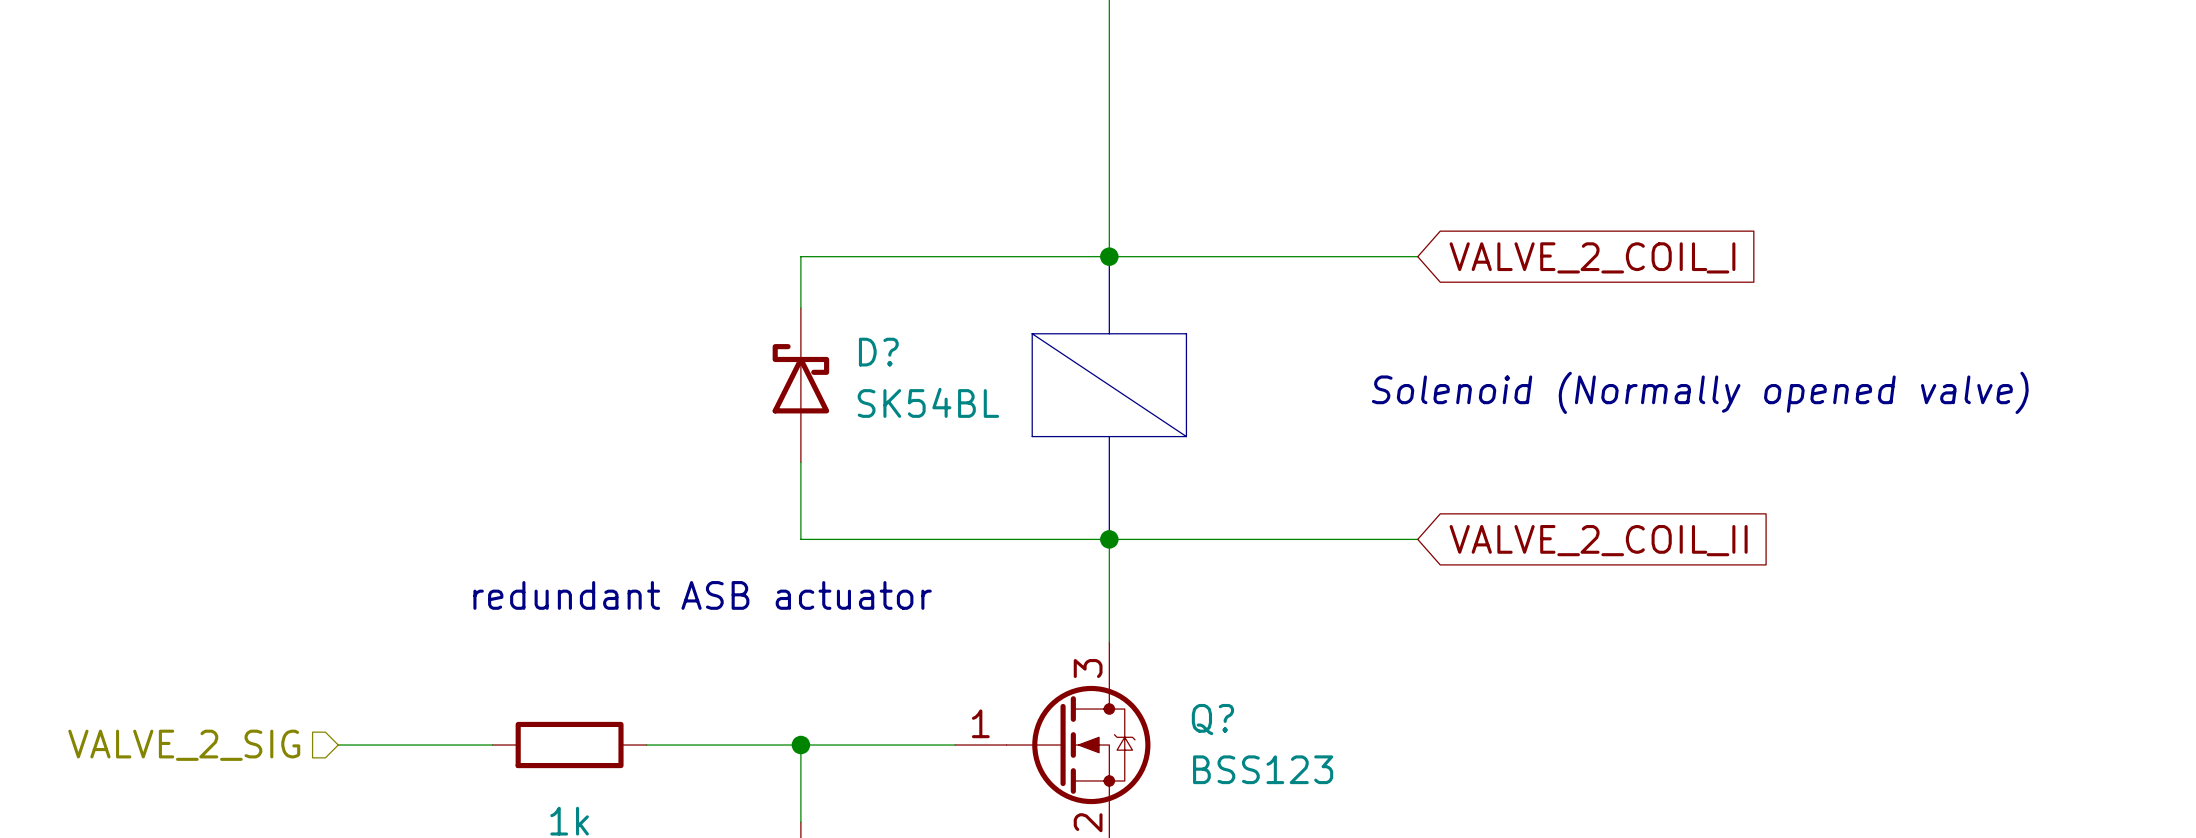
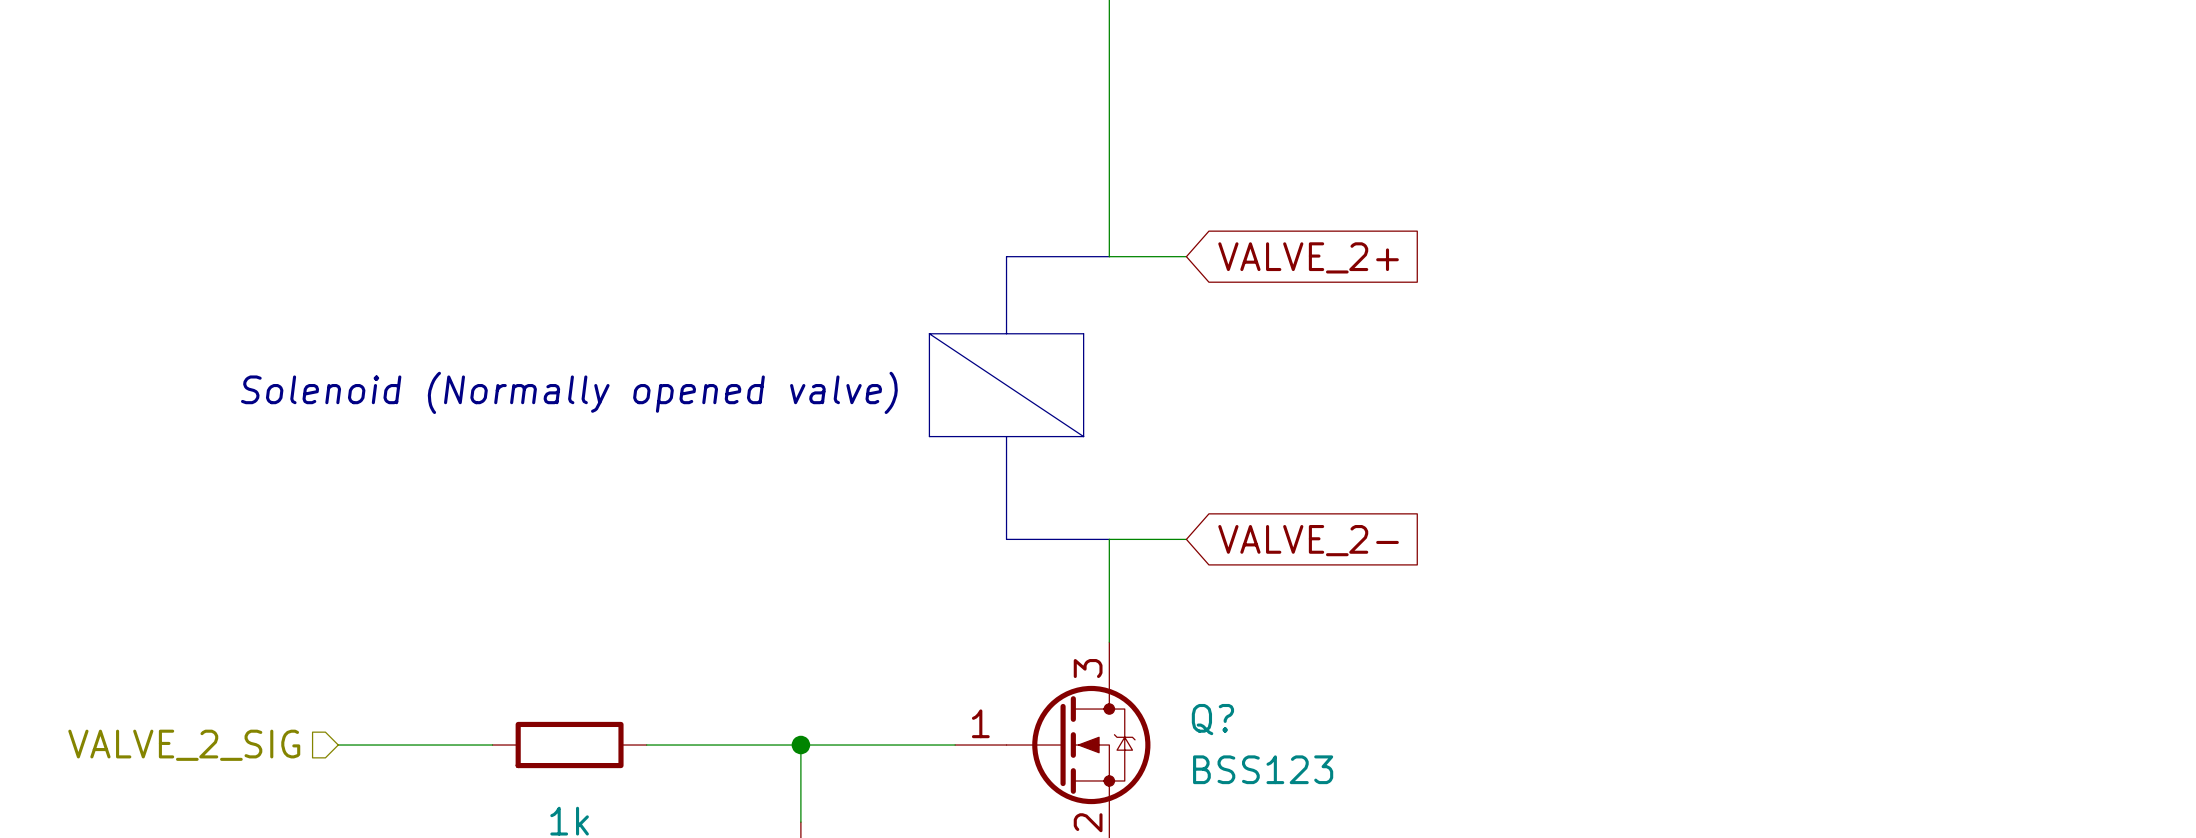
wire: (1109, 256) (800, 256) (800, 308) -> none
line: (1109, 256) (1109, 333) -> (1109, 256) (1006, 256) (1006, 333)
junction: (1109, 256) -> none
wire: (1186, 256) (1417, 256) -> none
global label: VALVE_2_COIL_I (1592, 257) -> VALVE_2+ (1308, 257)
line: (1083, 333) (1186, 333) (1186, 436) -> (1083, 333) (1083, 436) (929, 333)
D?: SK54BL (800, 385) -> none
text: none -> Solenoid (Normally opened valve) (569, 392)
text: Solenoid (Normally opened valve) (1700, 392) -> none
line: (1032, 436) (1032, 333) (1186, 436) -> (1032, 436) (929, 436) (929, 333)
line: (1083, 436) (1186, 436) -> (929, 333) (1032, 333)
line: (1109, 436) (1109, 539) -> (1006, 436) (1006, 539) (1109, 539)
wire: (800, 462) (800, 539) (1109, 539) -> none
junction: (1109, 539) -> none
wire: (1186, 539) (1417, 539) -> none
global label: VALVE_2_COIL_II (1598, 540) -> VALVE_2- (1308, 540)
text: redundant ASB actuator (702, 595) -> none

